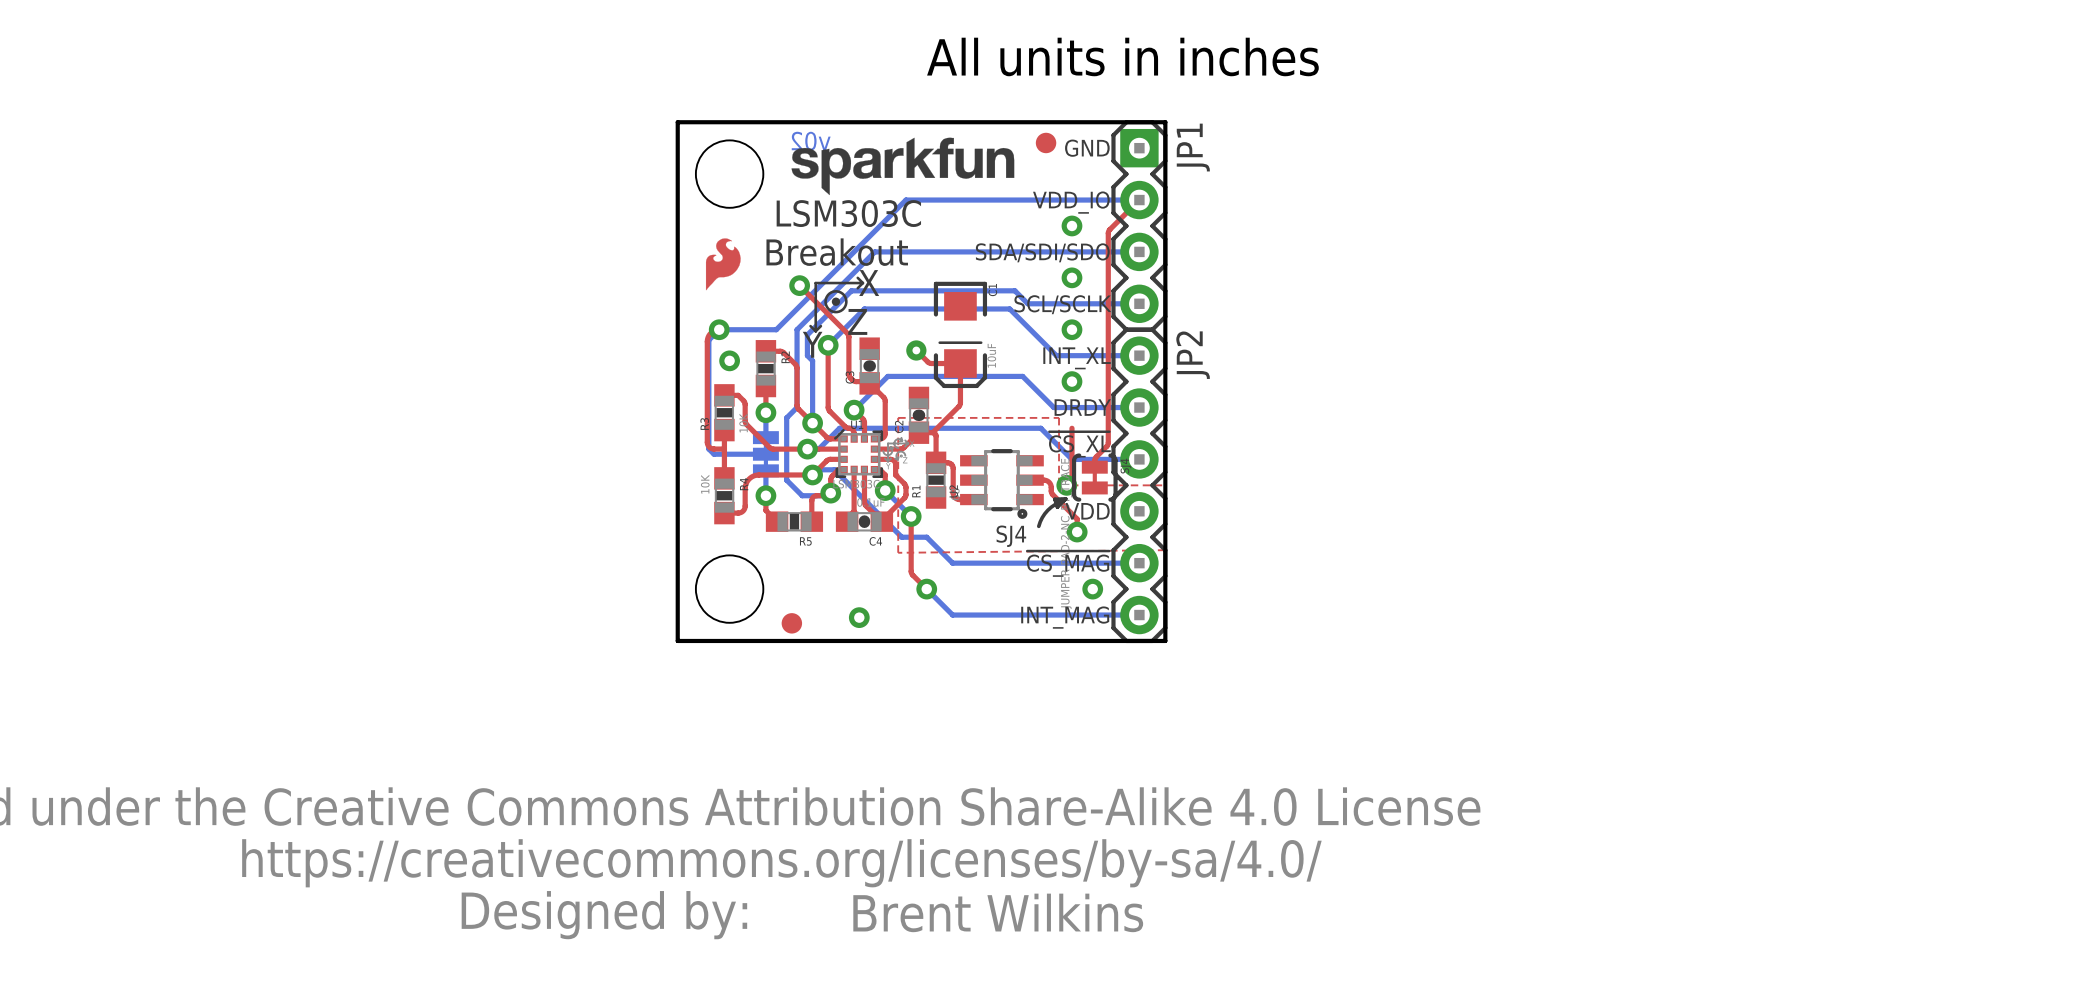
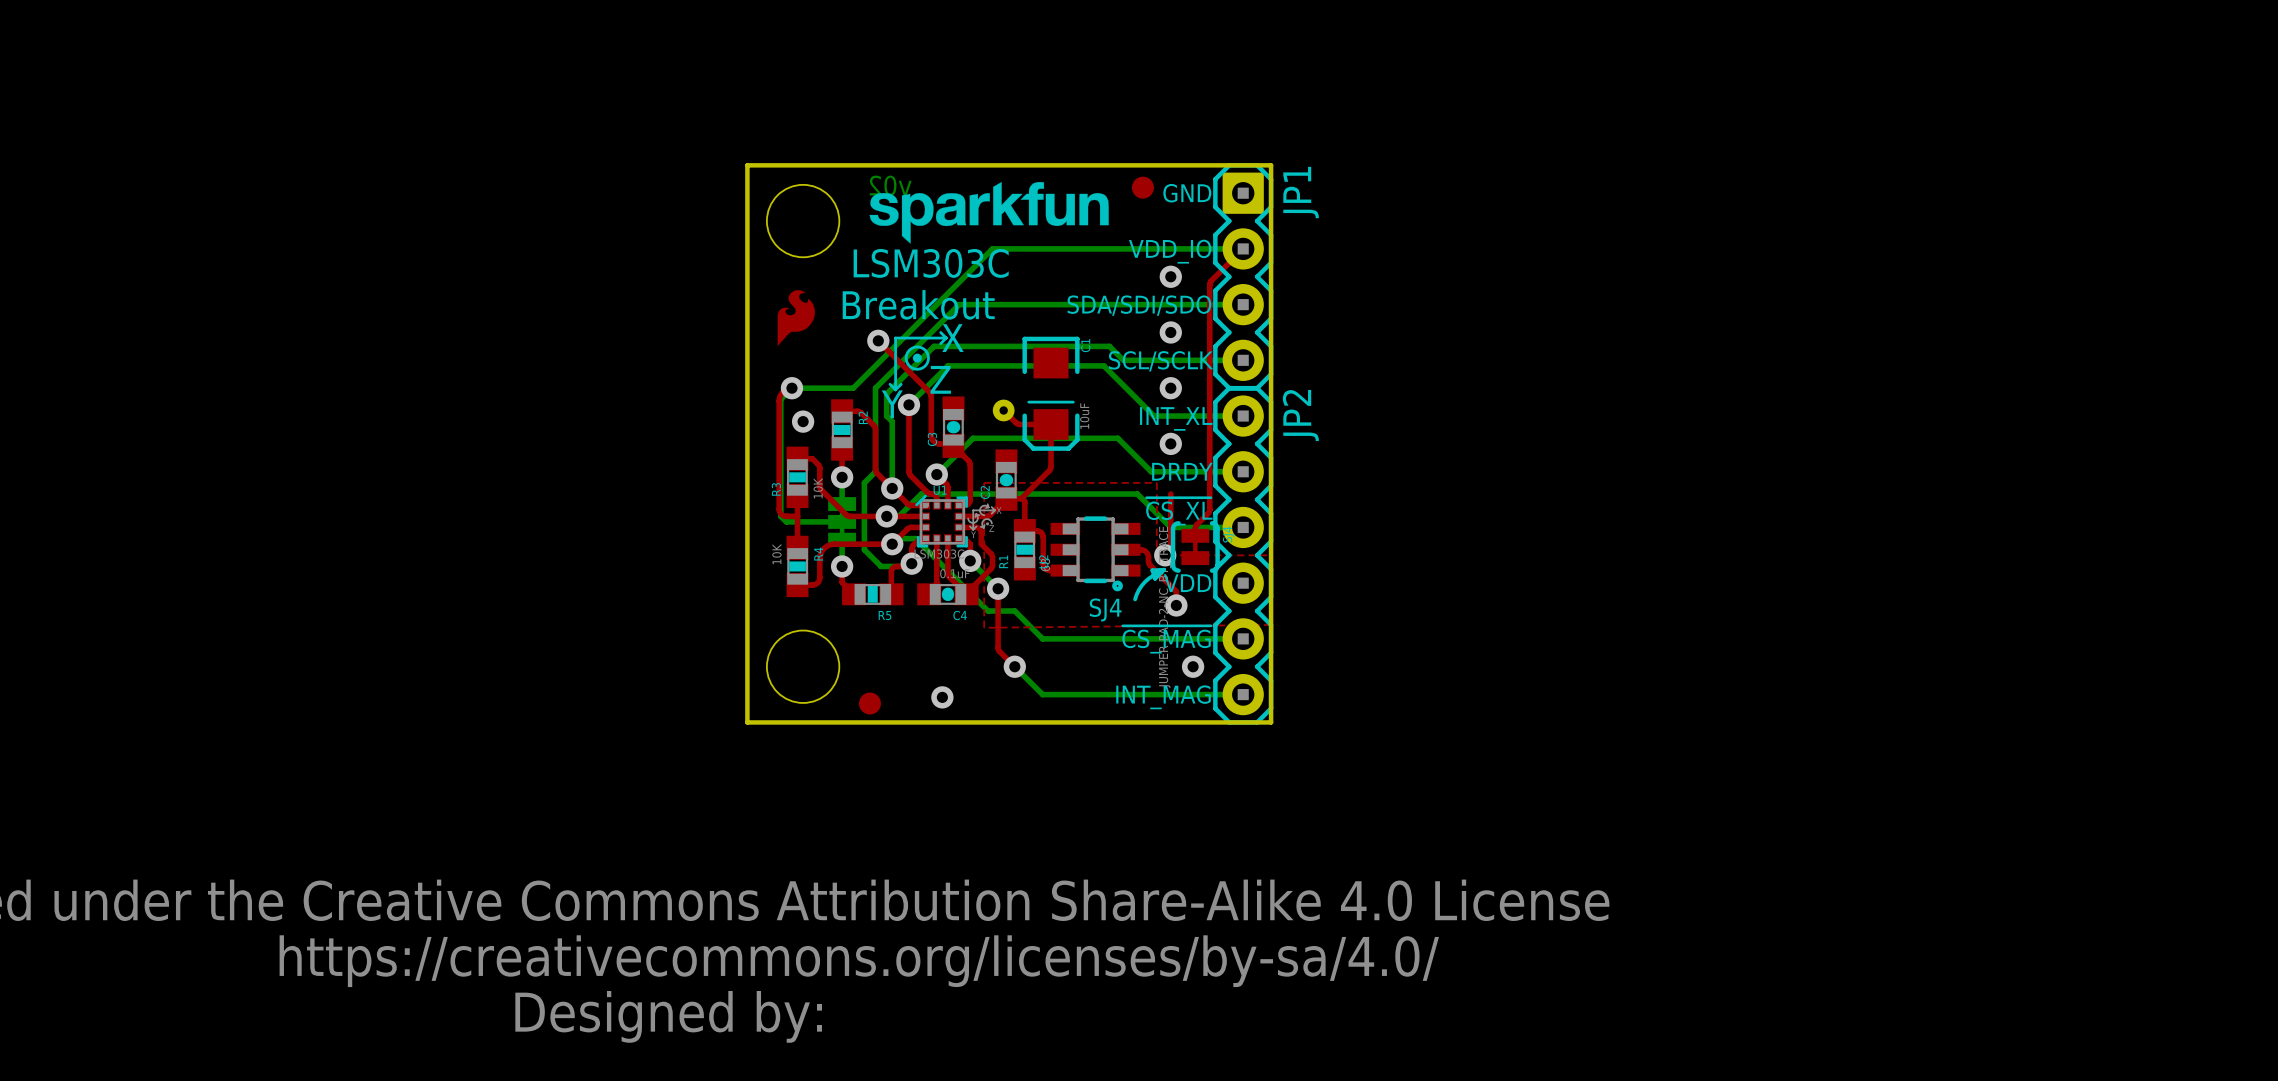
text: All units in inches (1122, 56) -> none
text: Brent Wilkins (998, 912) -> none

